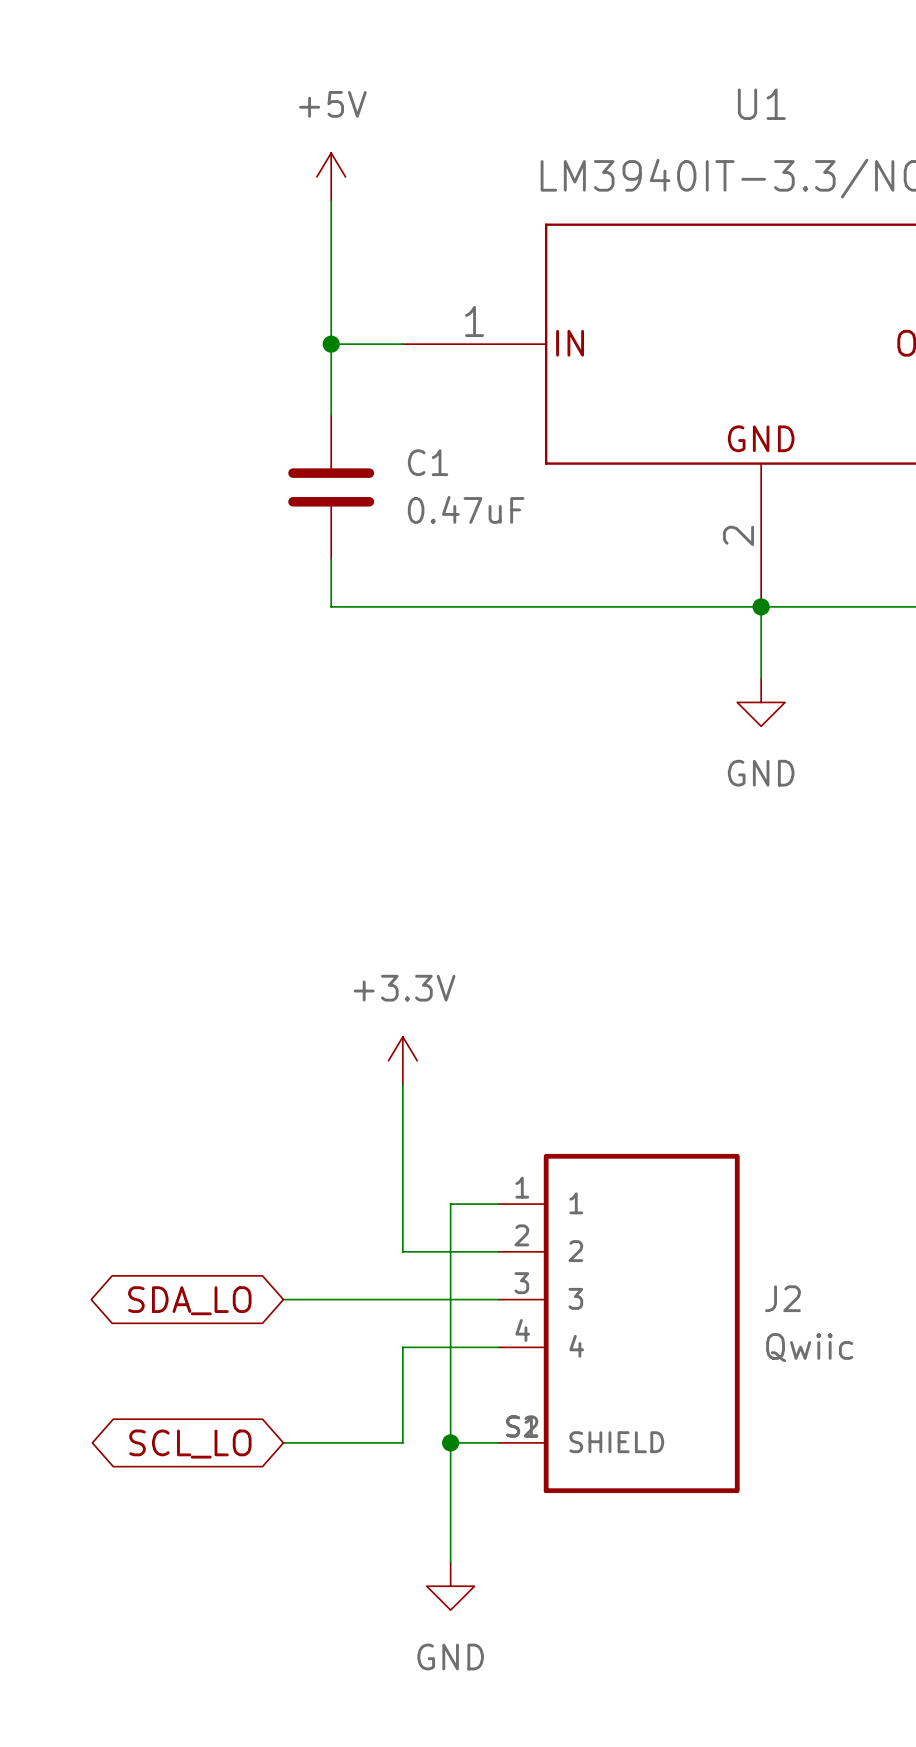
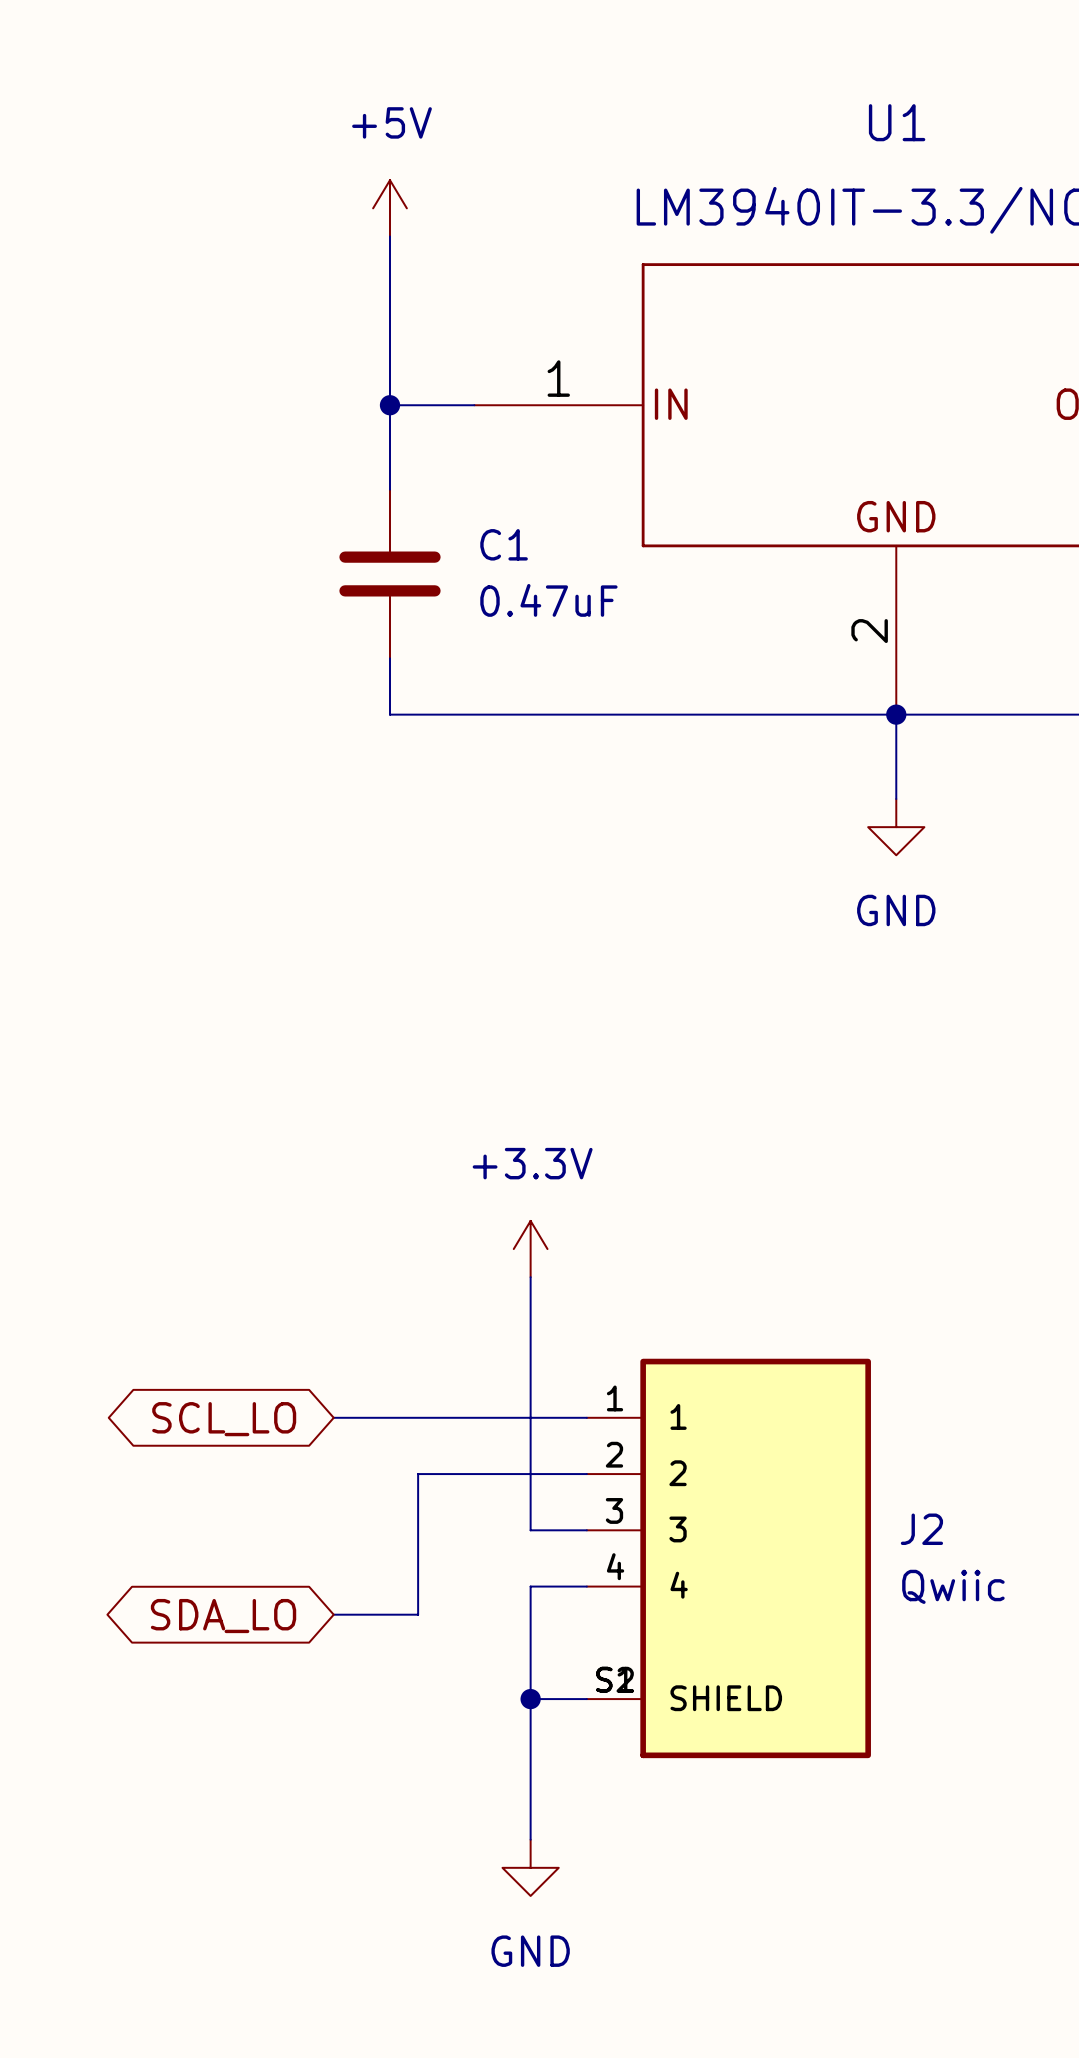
power symbol position: +3.3V (402, 1060) -> +3.3V (530, 1249)
wire: (402, 1084) (402, 1251) -> (333, 1614) (418, 1614) (418, 1474) (474, 1474)
wire: none -> (530, 1277) (530, 1417) (333, 1417)
wire: (283, 1299) (450, 1299) (450, 1347) (402, 1347) (402, 1442) (283, 1442) -> none
global label position: SDA_LO (189, 1300) -> SDA_LO (223, 1616)
global label position: SCL_LO (190, 1444) -> SCL_LO (224, 1419)

